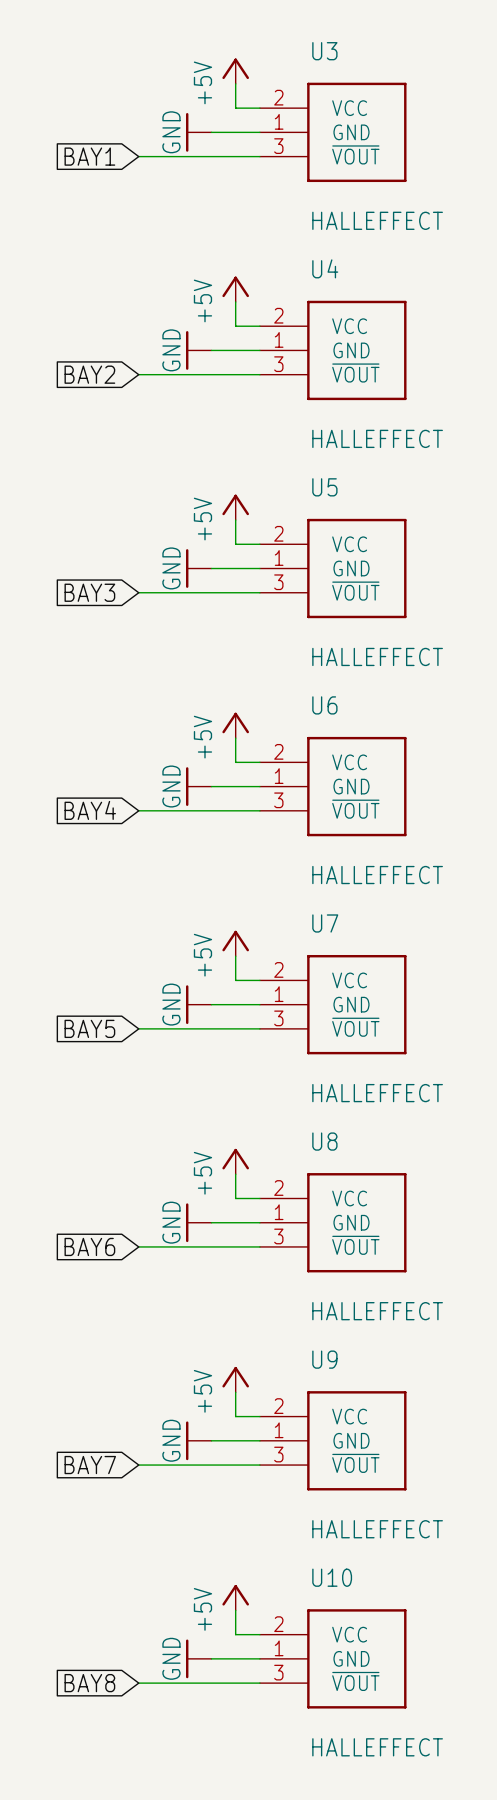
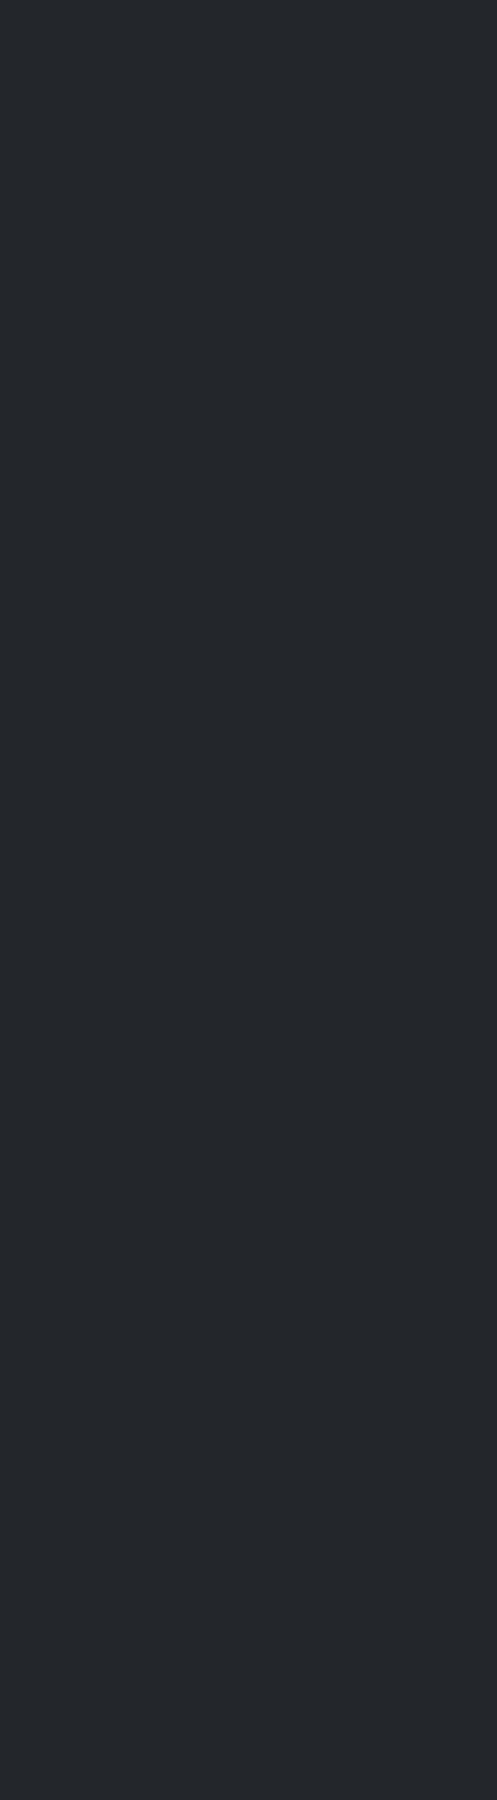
power symbol: +5V (235, 71) -> none
wire: (235, 83) (235, 108) (259, 108) -> none
power symbol: GND (198, 132) -> none
wire: (211, 132) (259, 132) -> none
U3: HALLEFFECT (333, 132) -> none
global label: BAY1 (89, 156) -> none
wire: (138, 156) (259, 156) -> none
power symbol: +5V (235, 289) -> none
wire: (235, 301) (235, 326) (259, 326) -> none
power symbol: GND (198, 350) -> none
wire: (211, 350) (259, 350) -> none
U4: HALLEFFECT (333, 350) -> none
global label: BAY2 (89, 374) -> none
wire: (138, 374) (259, 374) -> none
power symbol: +5V (235, 507) -> none
wire: (235, 520) (235, 544) (259, 544) -> none
power symbol: GND (198, 568) -> none
wire: (211, 568) (259, 568) -> none
U5: HALLEFFECT (333, 568) -> none
global label: BAY3 (89, 592) -> none
wire: (138, 592) (259, 592) -> none
power symbol: +5V (235, 725) -> none
wire: (235, 738) (235, 762) (259, 762) -> none
power symbol: GND (198, 786) -> none
wire: (211, 786) (259, 786) -> none
U6: HALLEFFECT (333, 786) -> none
global label: BAY4 (90, 810) -> none
wire: (138, 810) (259, 810) -> none
power symbol: +5V (235, 943) -> none
wire: (235, 956) (235, 980) (259, 980) -> none
power symbol: GND (198, 1004) -> none
wire: (211, 1004) (259, 1004) -> none
U7: HALLEFFECT (333, 1004) -> none
global label: BAY5 (89, 1028) -> none
wire: (138, 1028) (259, 1028) -> none
power symbol: +5V (235, 1161) -> none
wire: (235, 1174) (235, 1198) (259, 1198) -> none
power symbol: GND (198, 1222) -> none
wire: (211, 1222) (259, 1222) -> none
U8: HALLEFFECT (333, 1222) -> none
global label: BAY6 (89, 1246) -> none
wire: (138, 1246) (259, 1246) -> none
power symbol: +5V (235, 1379) -> none
wire: (235, 1392) (235, 1416) (259, 1416) -> none
power symbol: GND (198, 1440) -> none
wire: (211, 1440) (259, 1440) -> none
U9: HALLEFFECT (333, 1440) -> none
global label: BAY7 (90, 1465) -> none
wire: (138, 1465) (259, 1465) -> none
power symbol: +5V (235, 1597) -> none
wire: (235, 1610) (235, 1634) (259, 1634) -> none
power symbol: GND (198, 1658) -> none
wire: (211, 1658) (259, 1658) -> none
U10: HALLEFFECT (333, 1658) -> none
global label: BAY8 (89, 1683) -> none
wire: (138, 1683) (259, 1683) -> none

